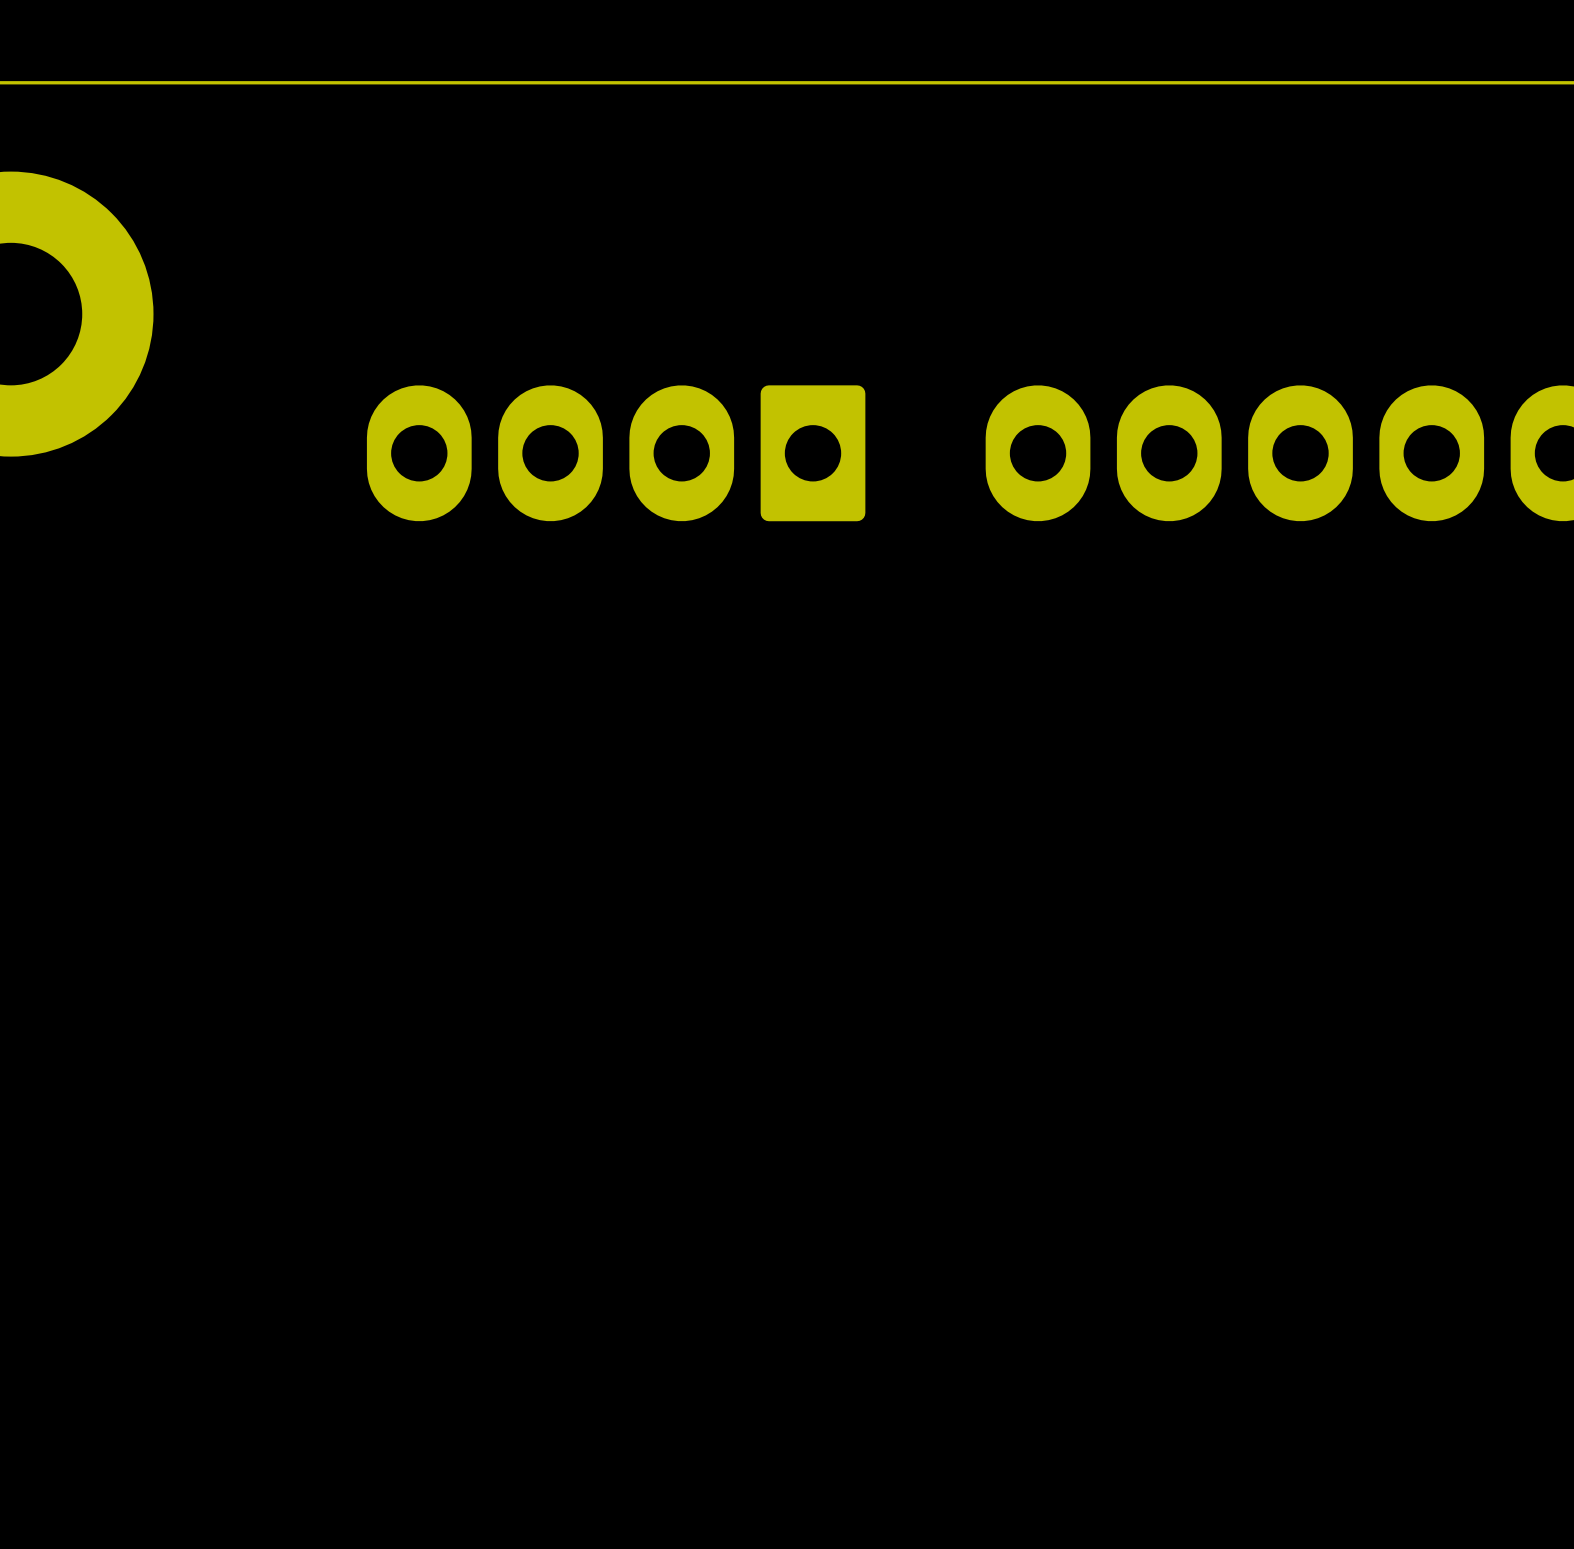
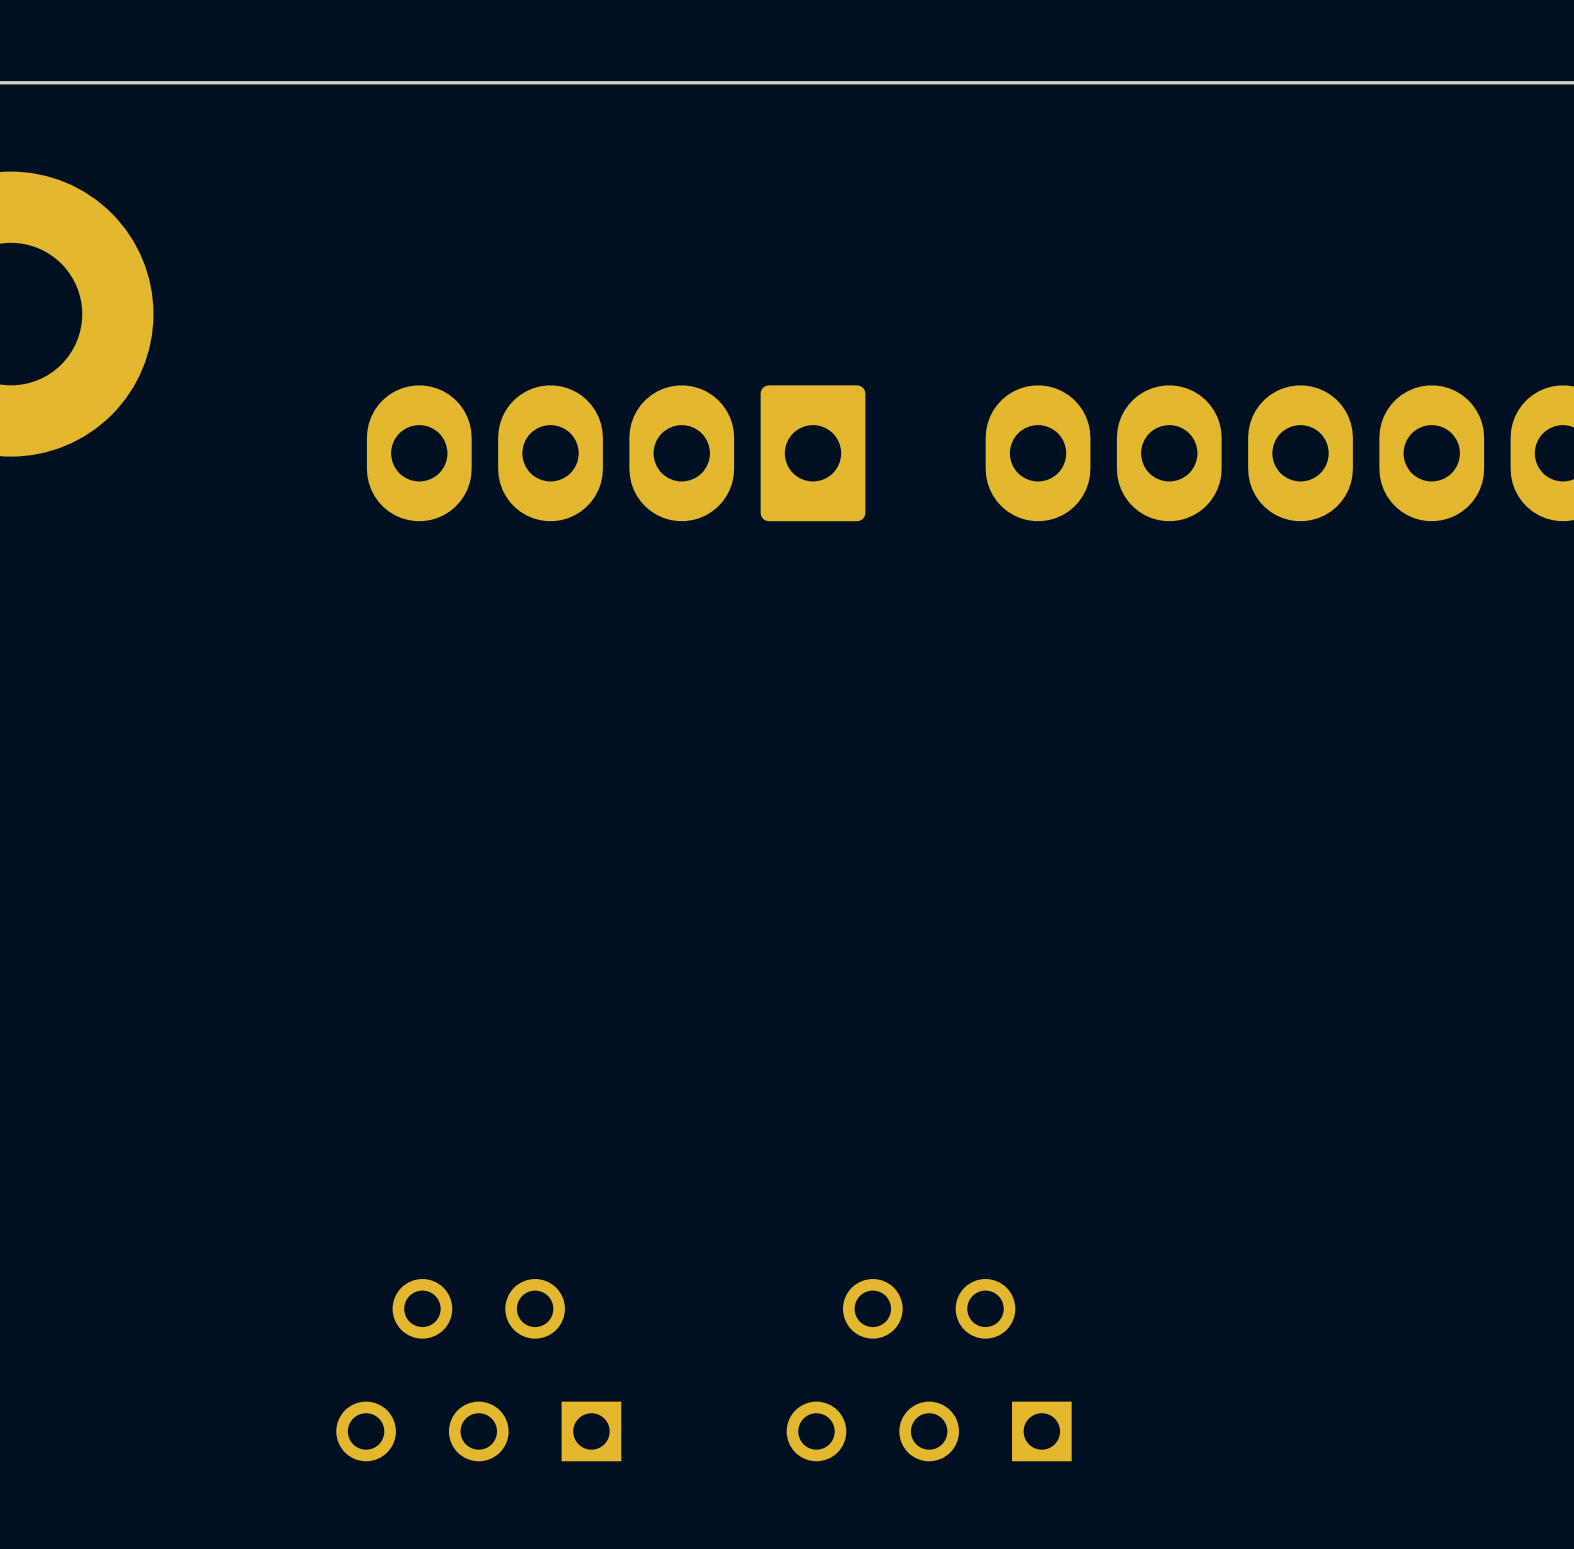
part: none -> (478, 1370)
part: none -> (929, 1370)

